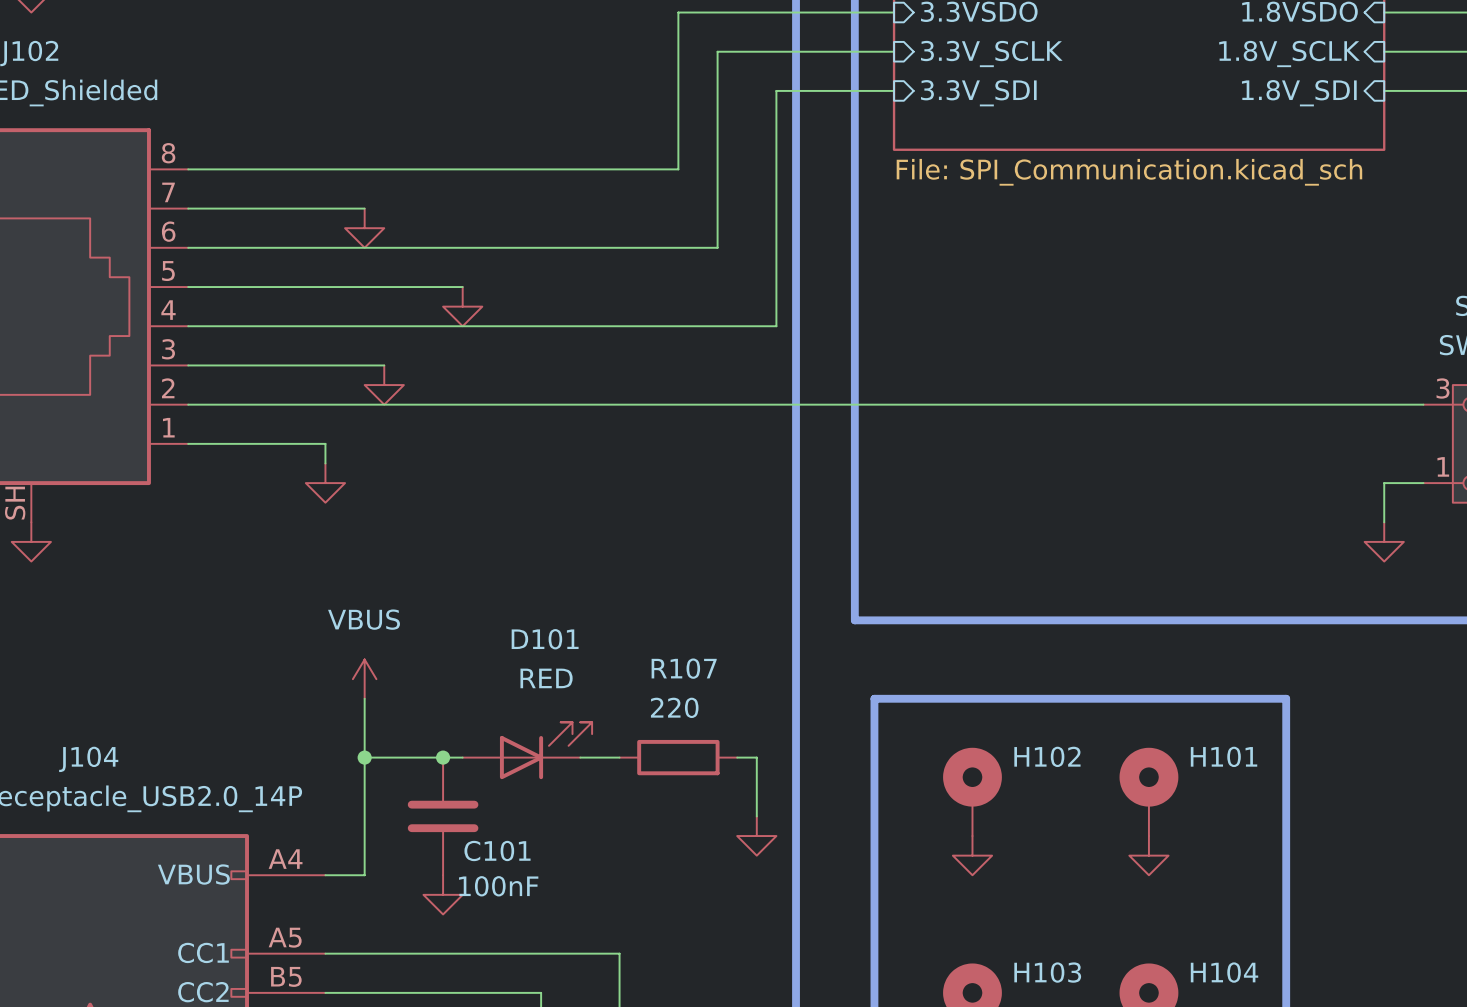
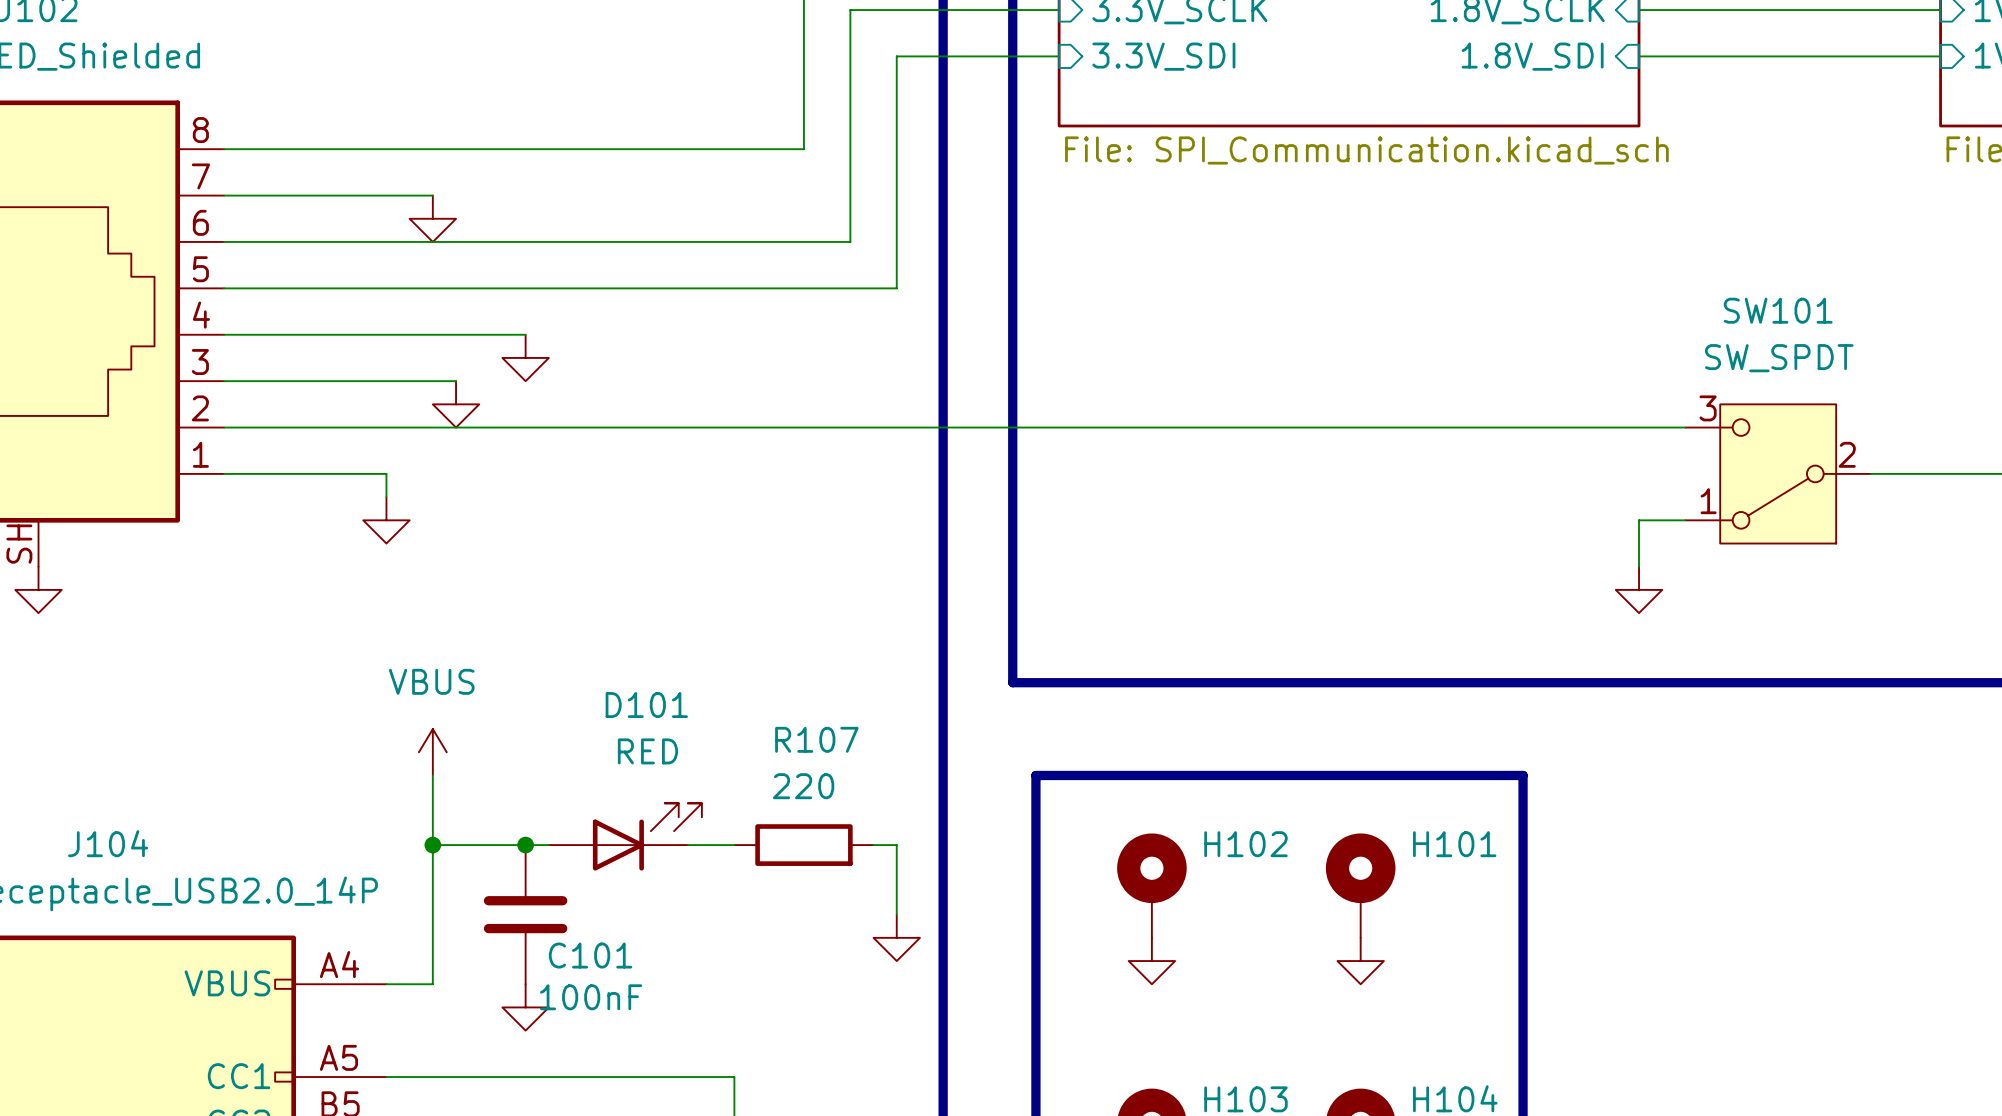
wire: (776, 90) (776, 326) (443, 326) -> (919, 56) (896, 56) (896, 288) (548, 288)
power symbol position: (462, 306) -> (525, 357)

